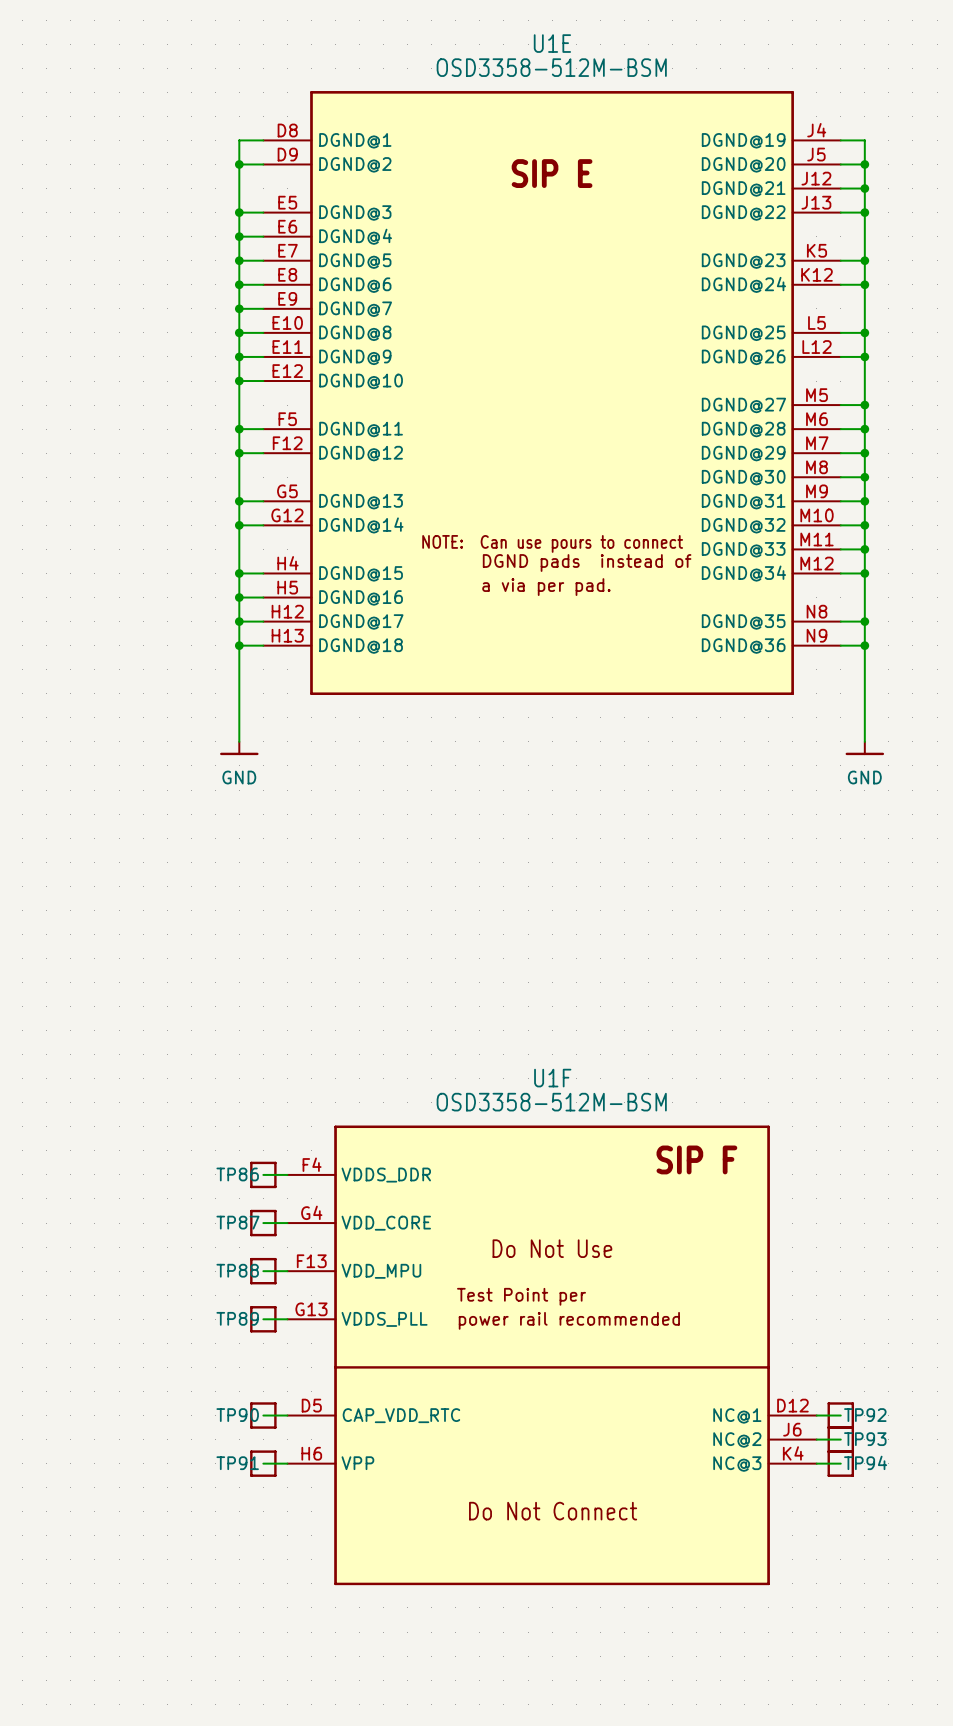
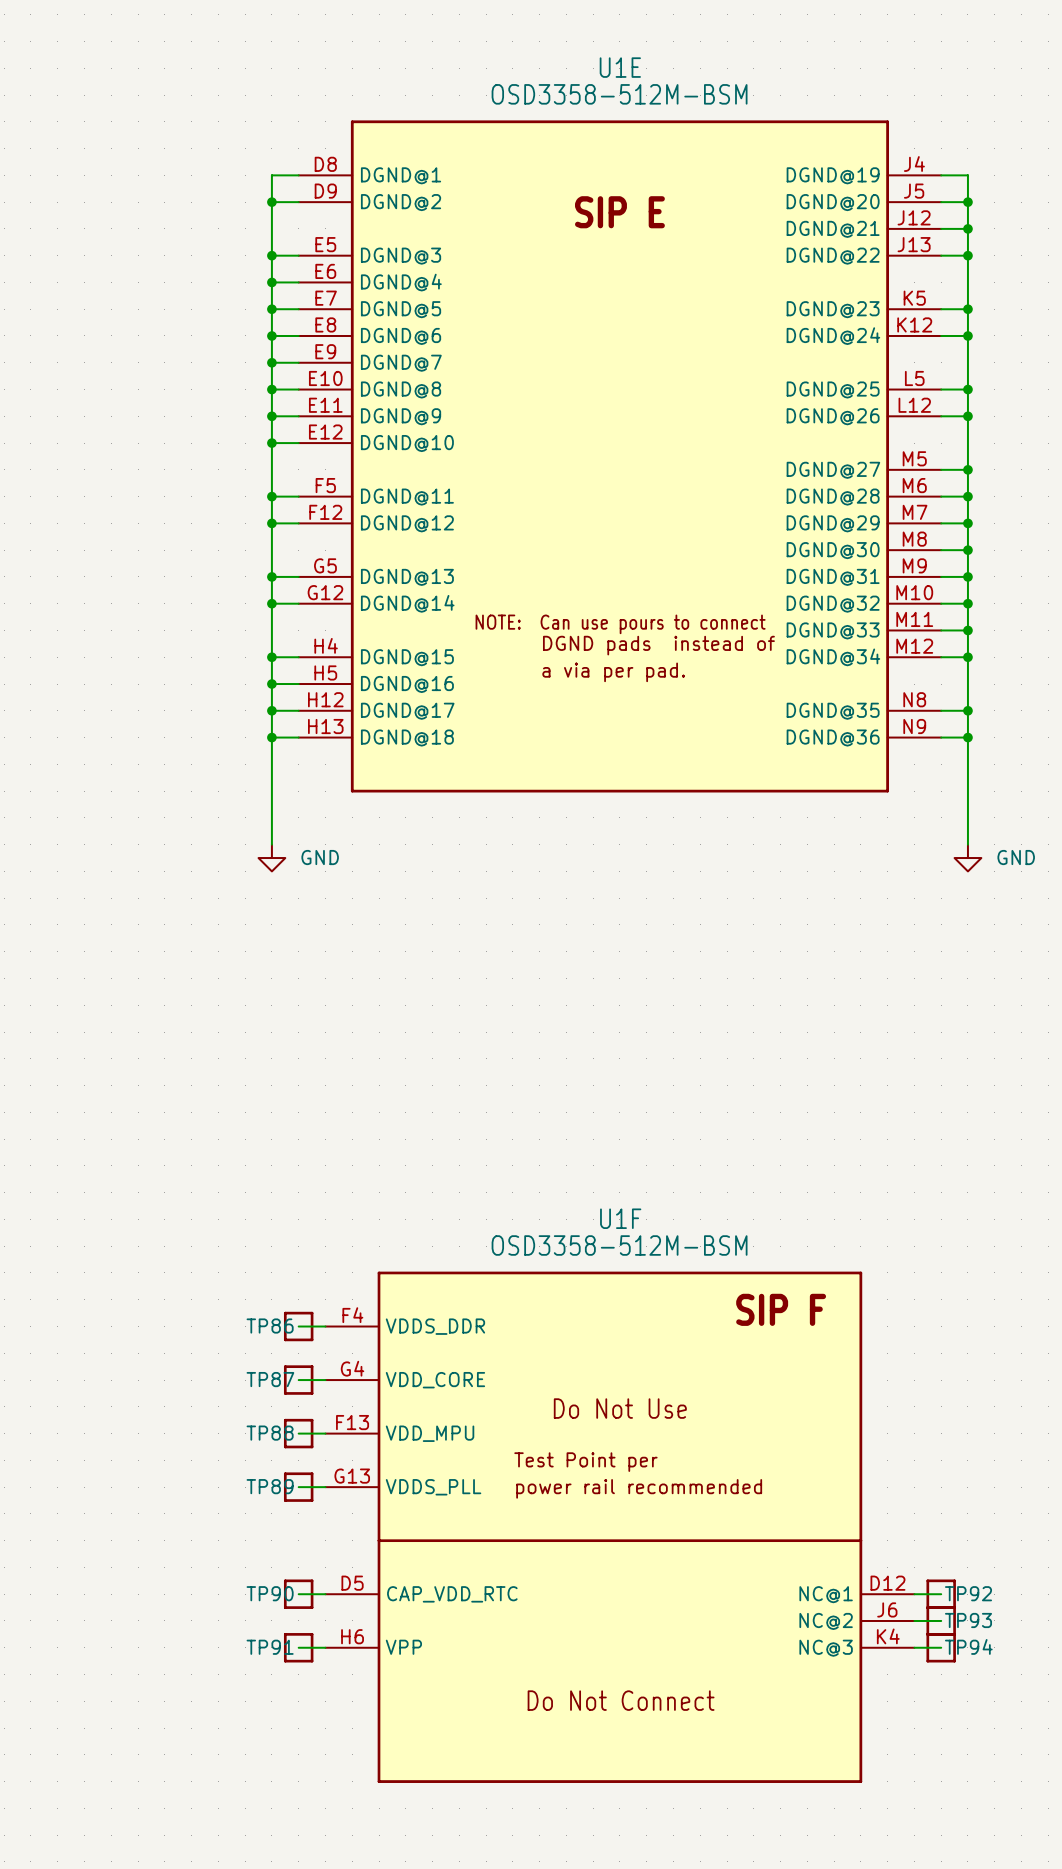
power symbol shape: [220, 741, 259, 756] -> [258, 844, 286, 872]
power symbol shape: [845, 741, 885, 756] -> [954, 844, 982, 872]
power symbol text position: GND (239, 777) -> GND (320, 857)
power symbol text position: GND (864, 777) -> GND (1016, 857)

